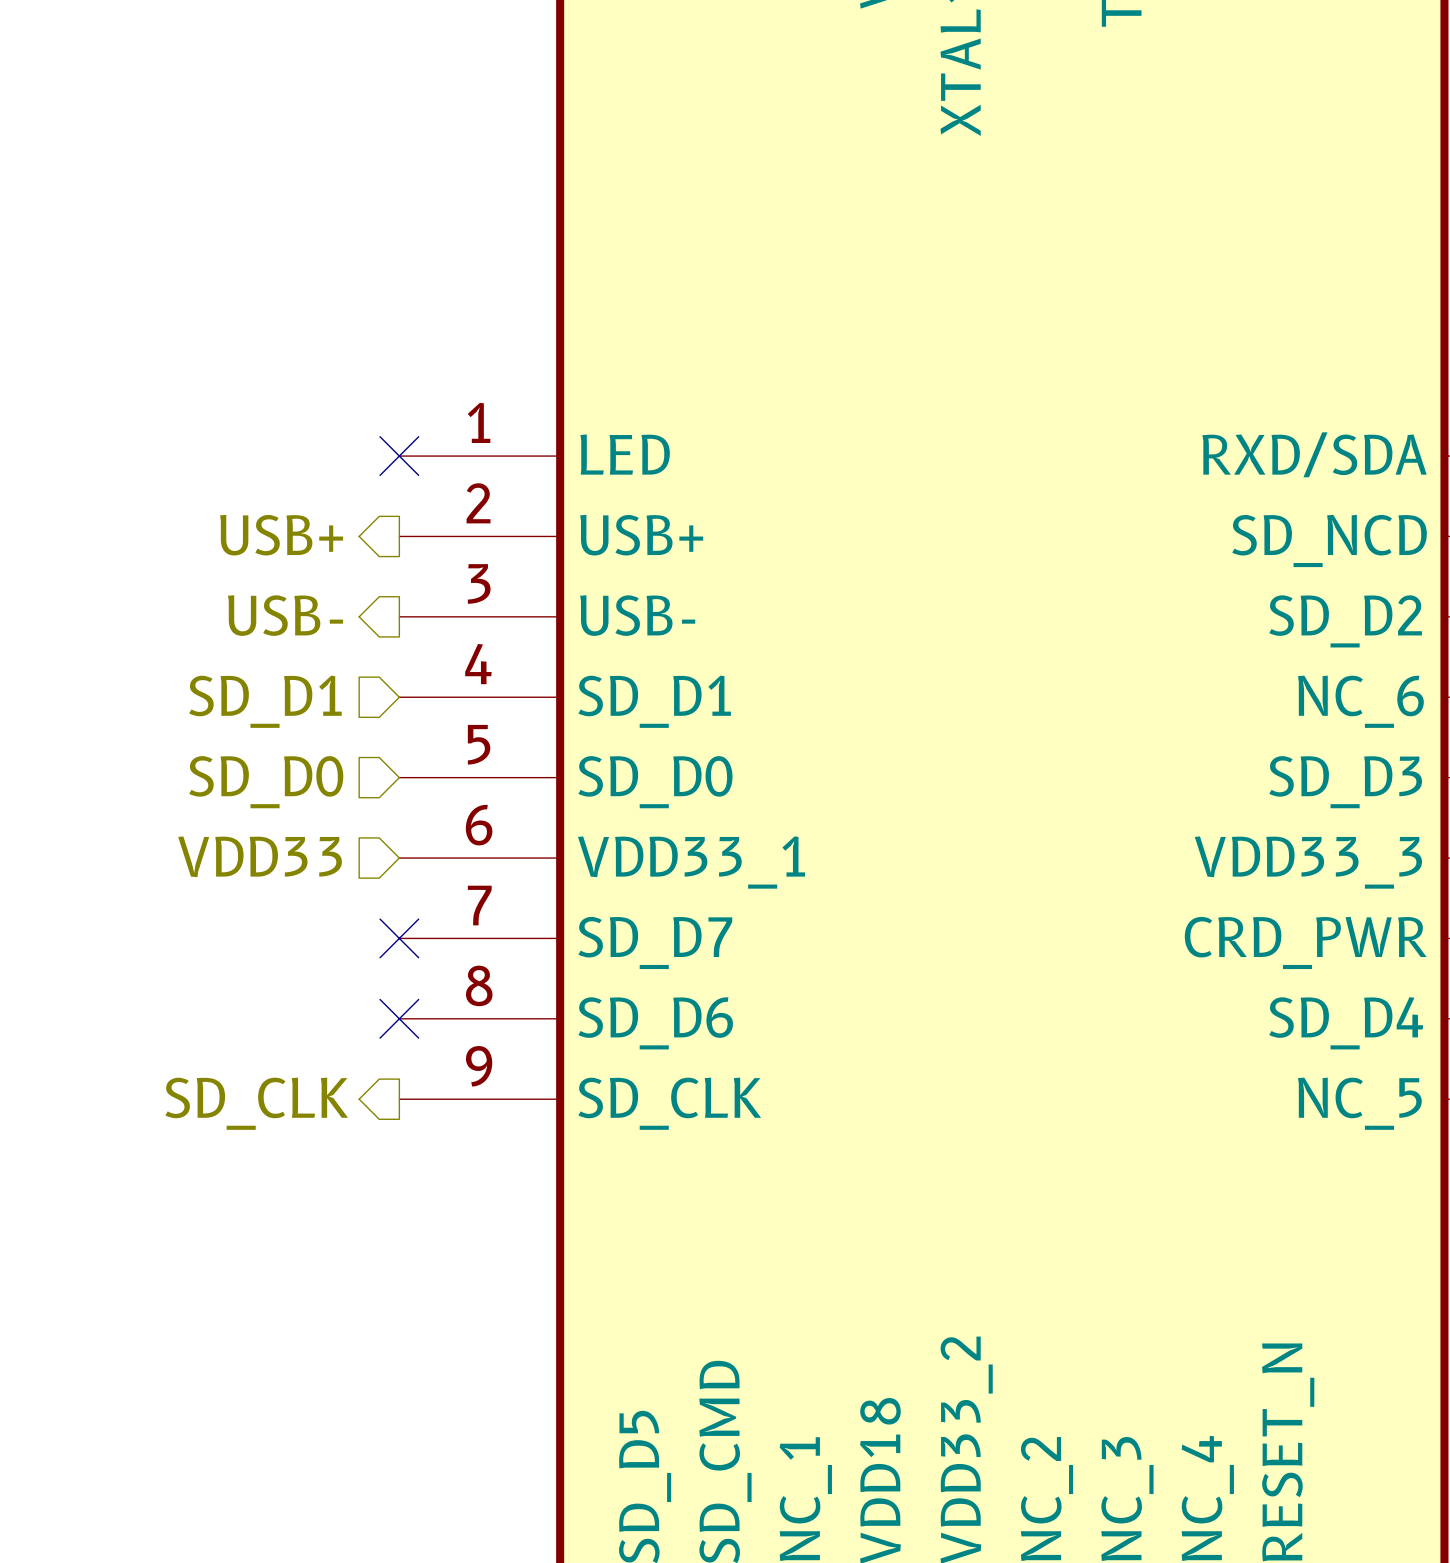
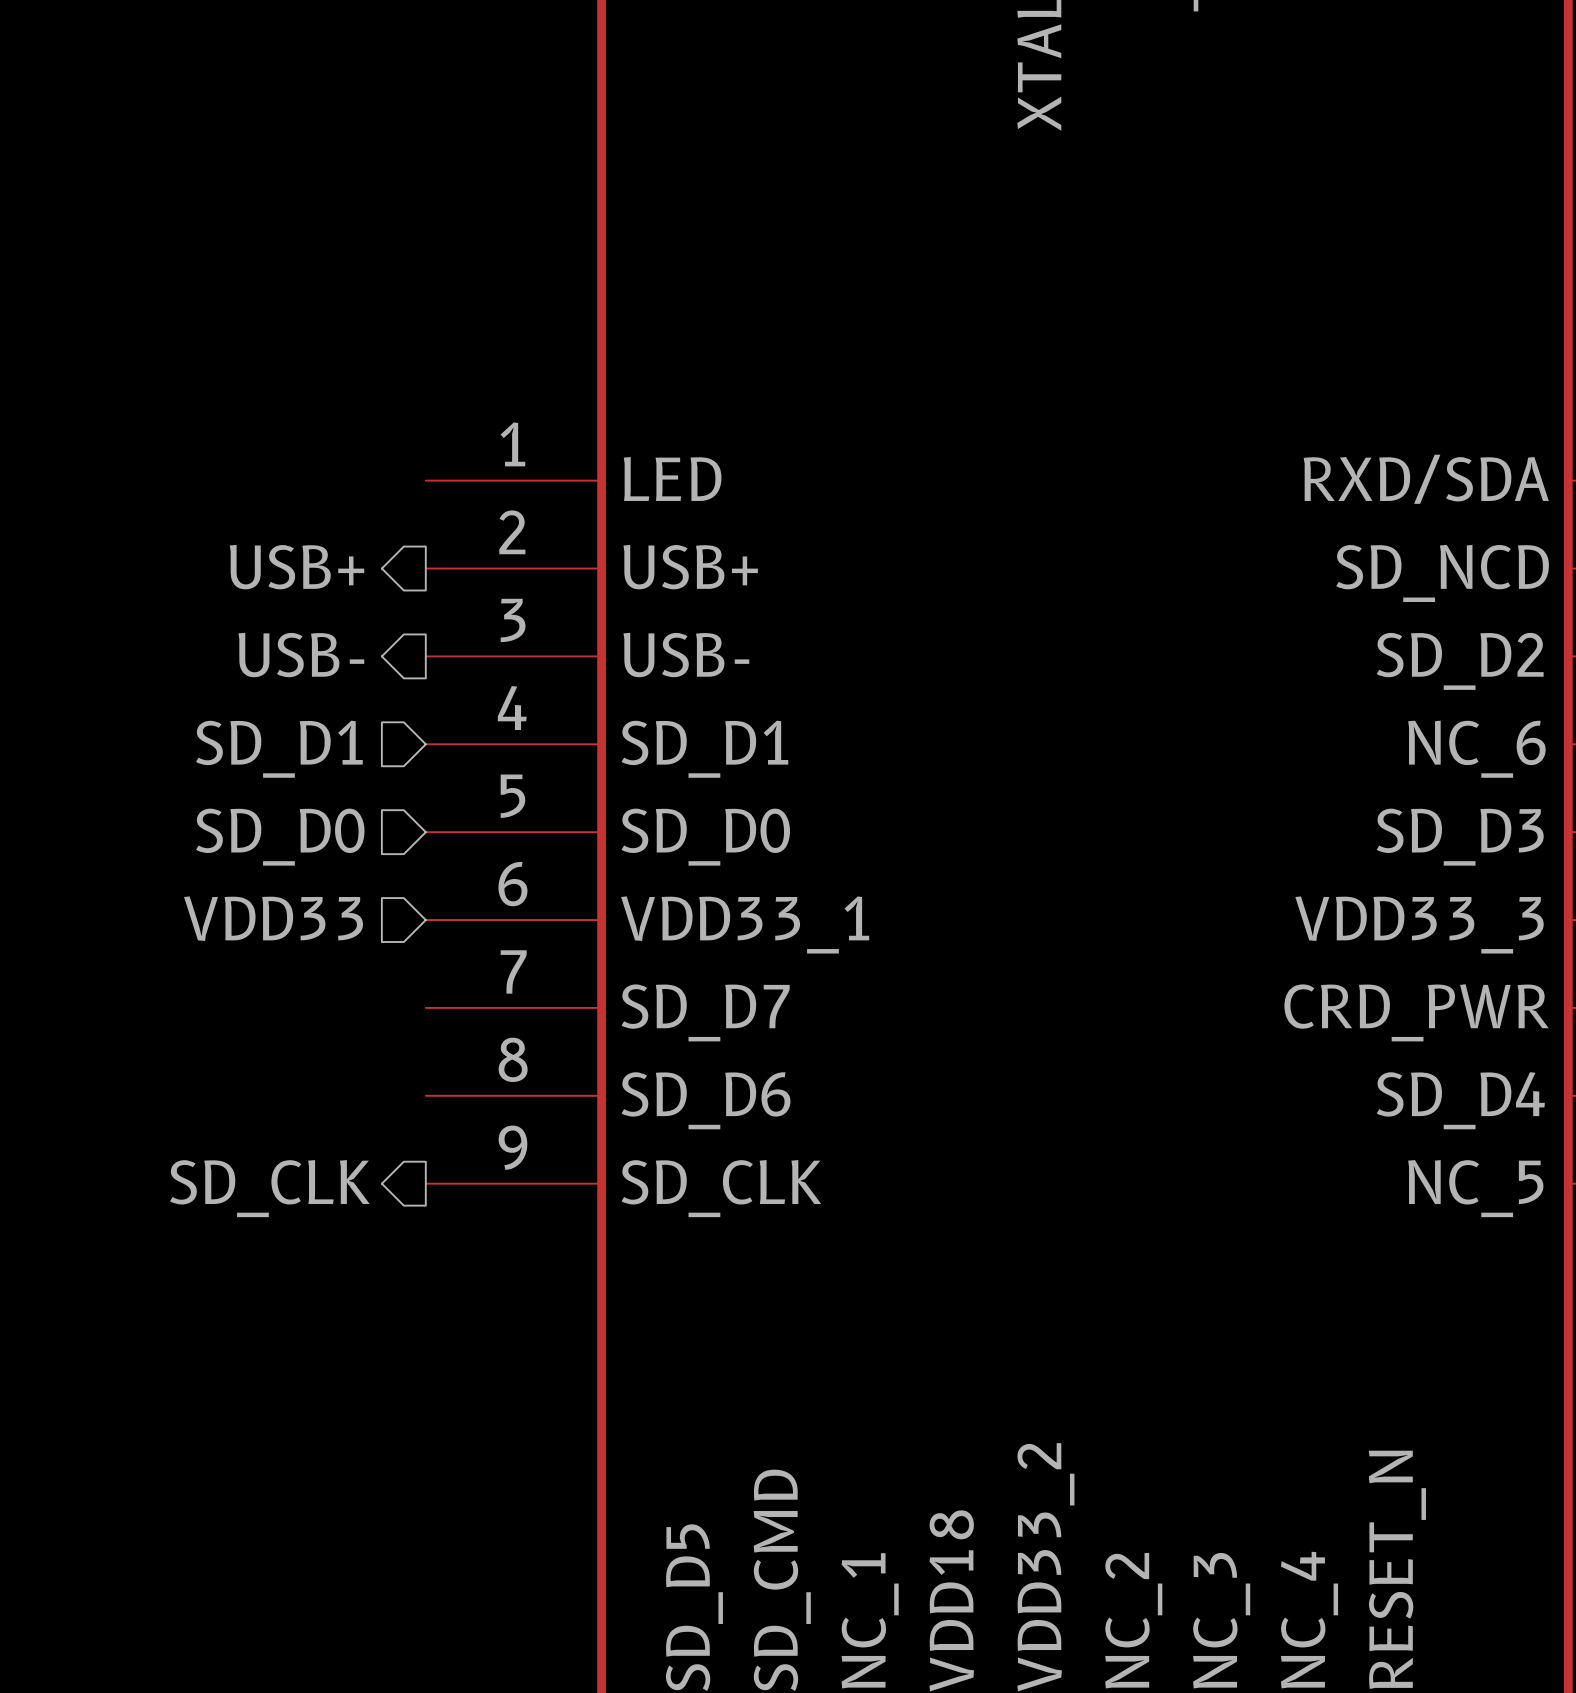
no-connect mark: (399, 456) -> none
no-connect mark: (399, 938) -> none
no-connect mark: (399, 1018) -> none

